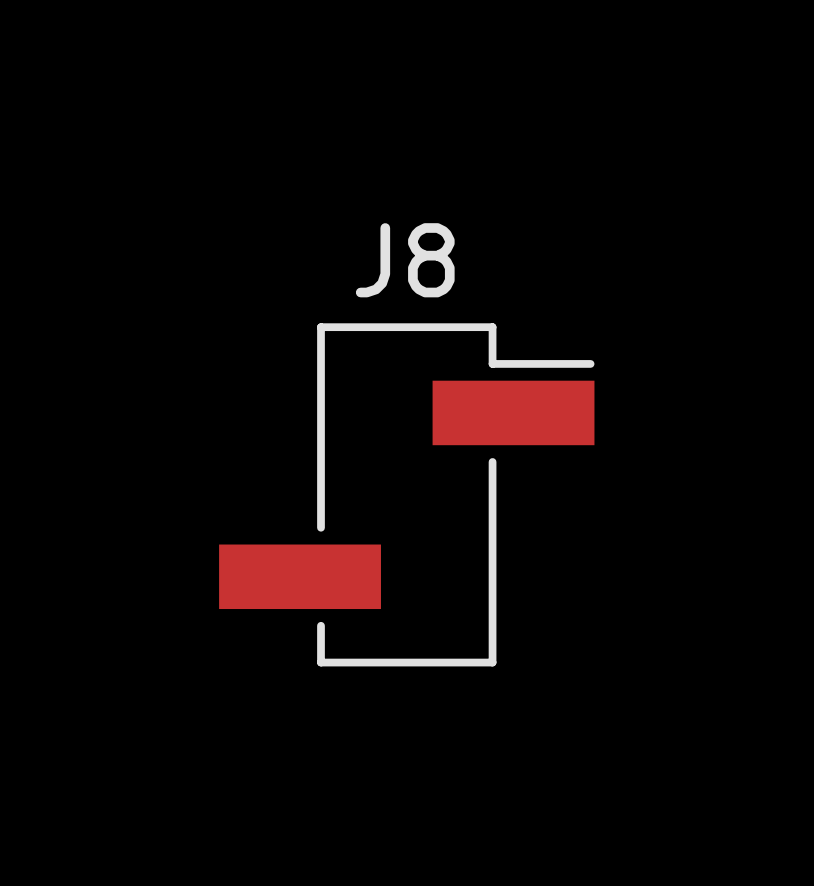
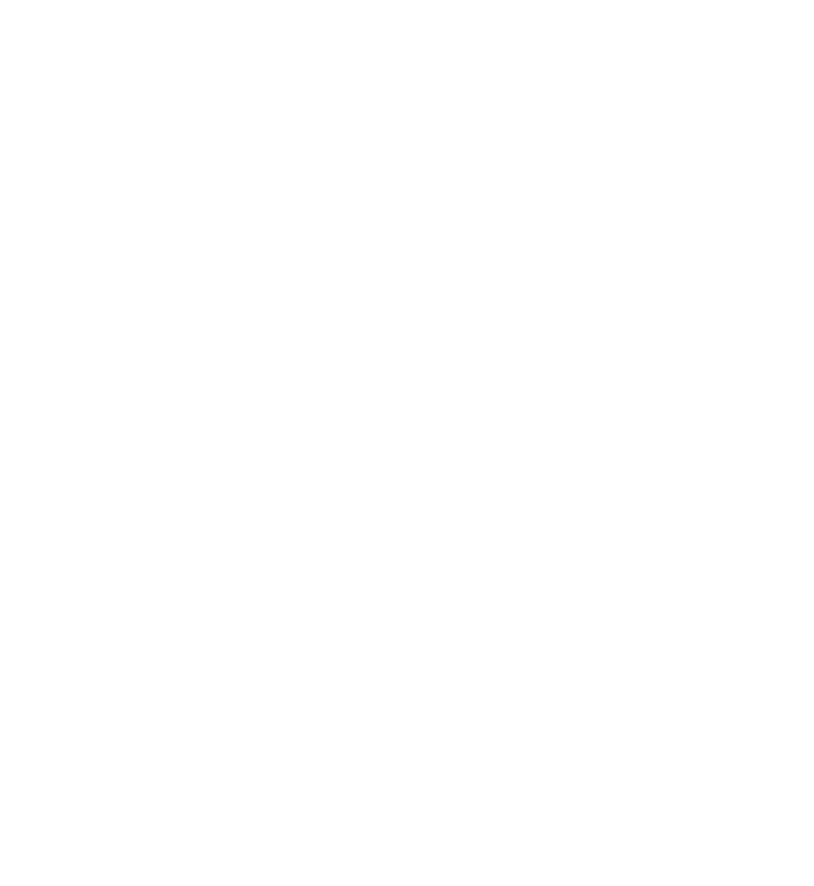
J8: (406, 494) -> none

